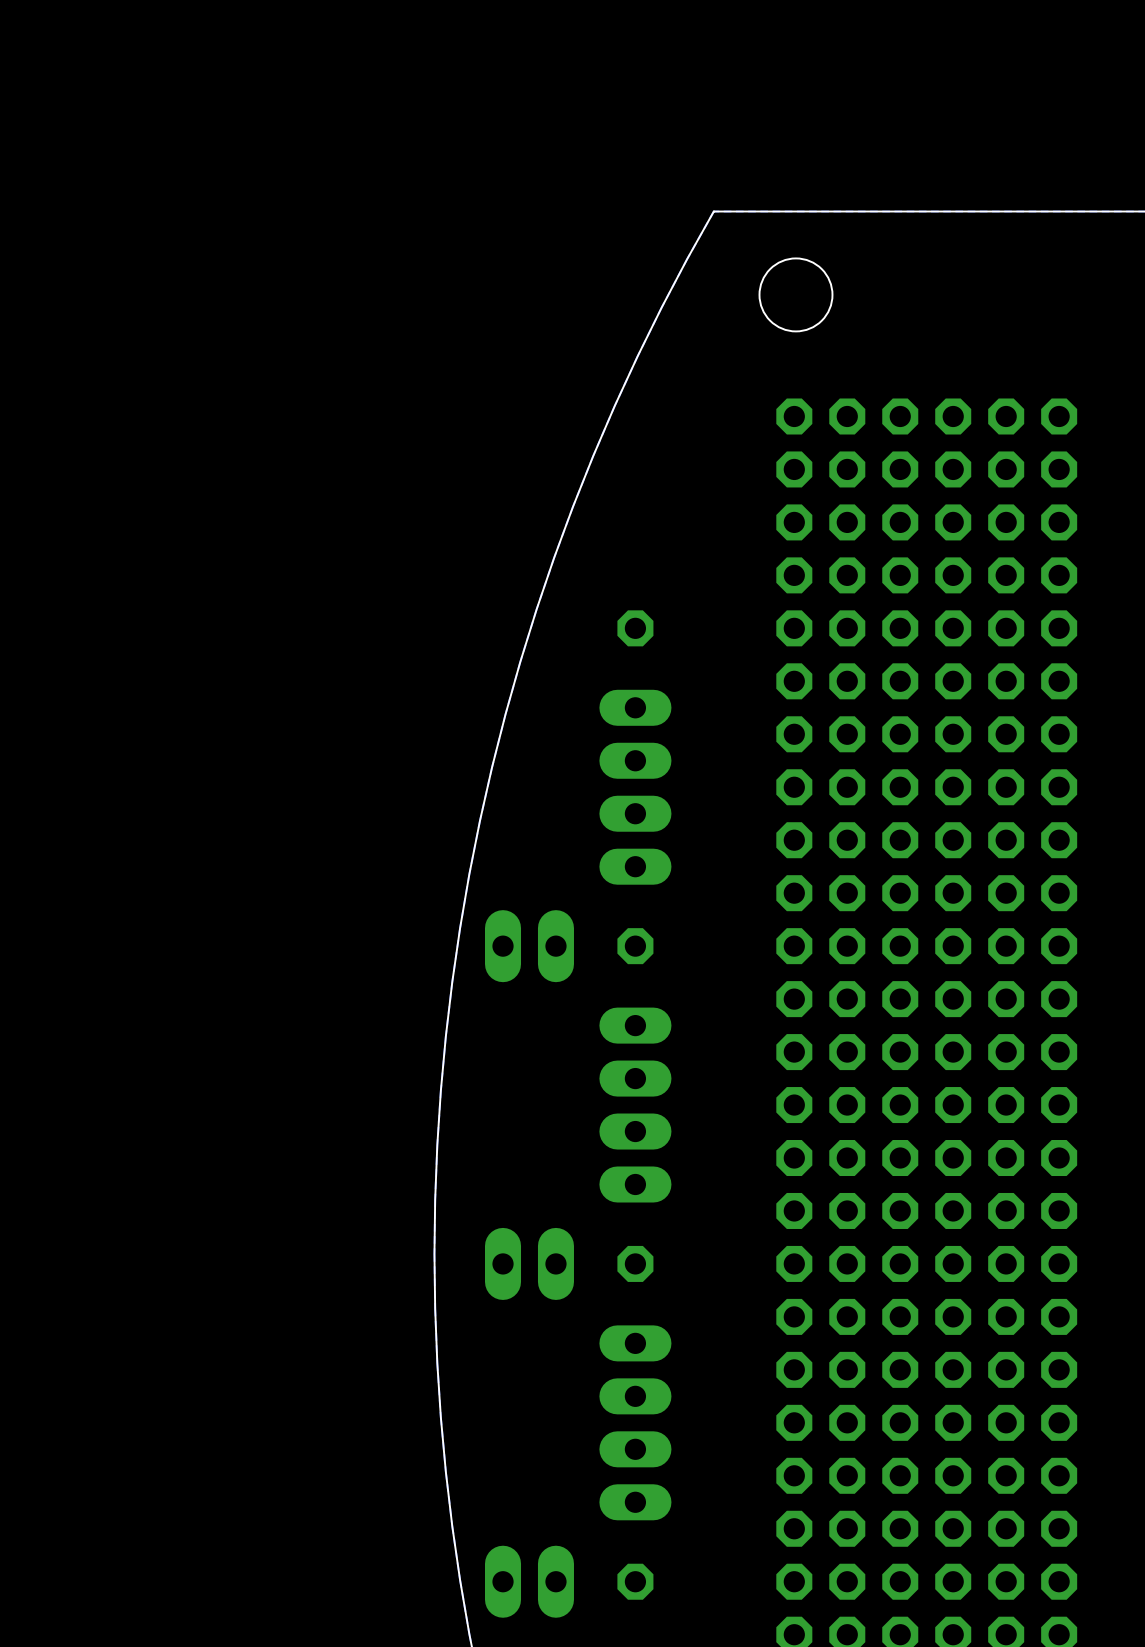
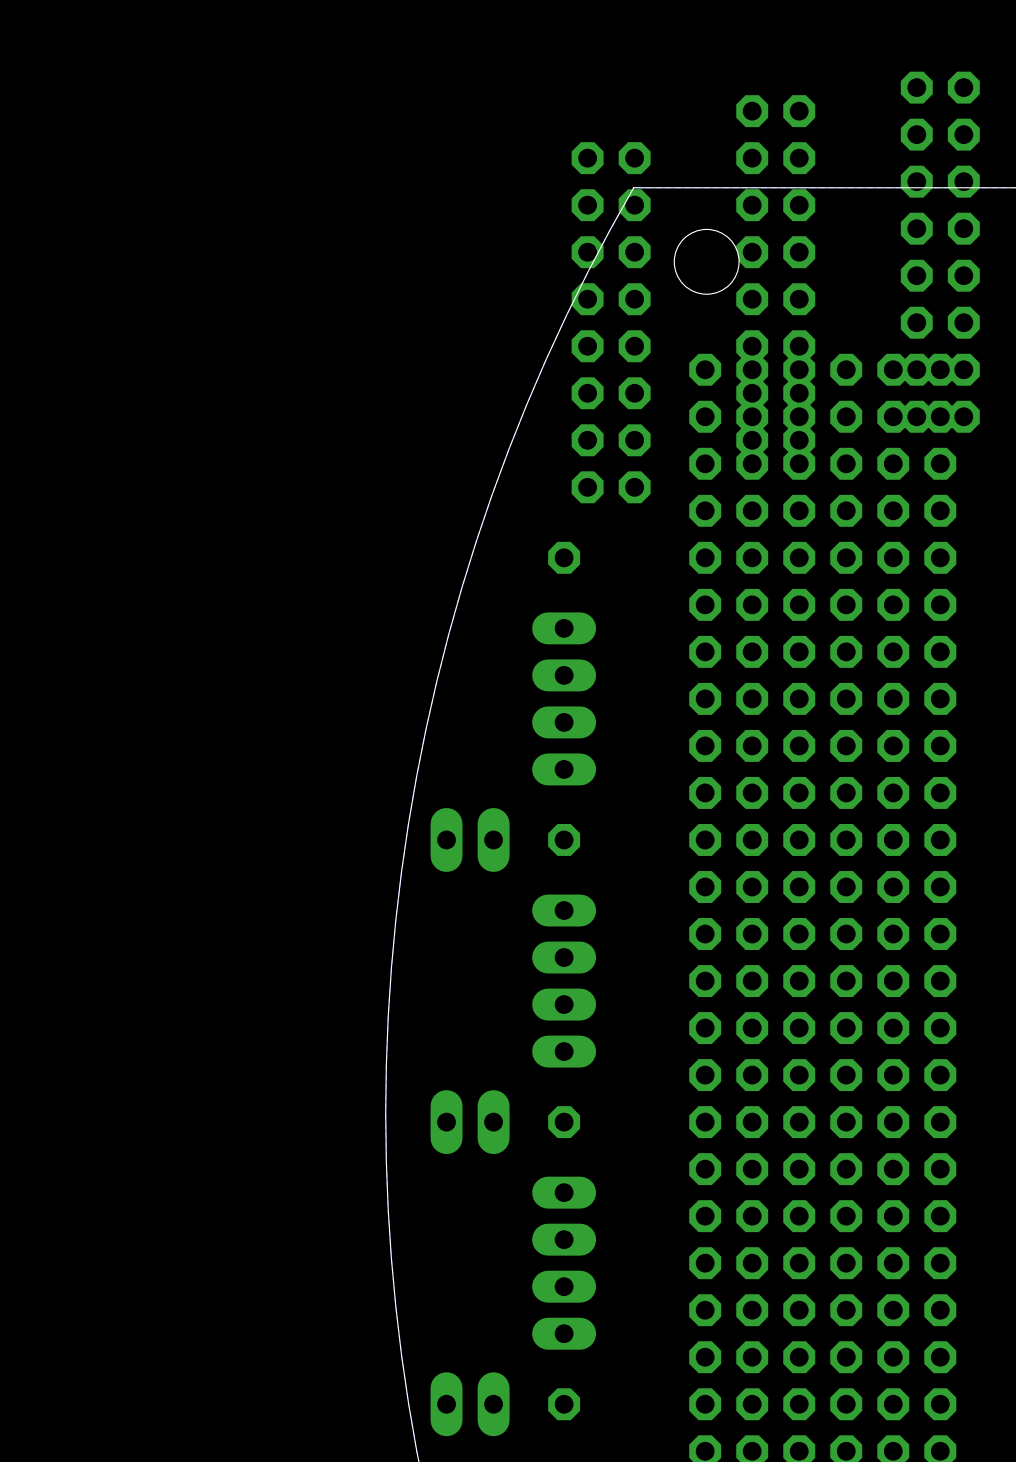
part: none -> (940, 252)
part: none -> (775, 275)
part: none -> (611, 322)

